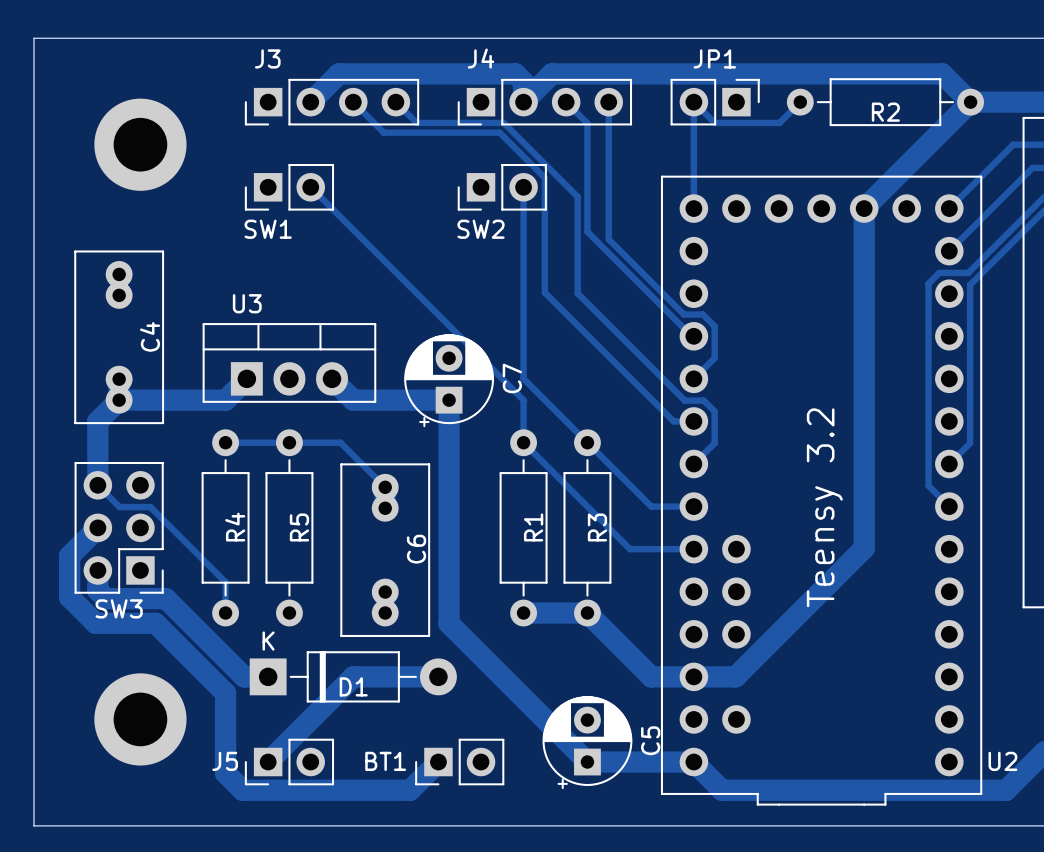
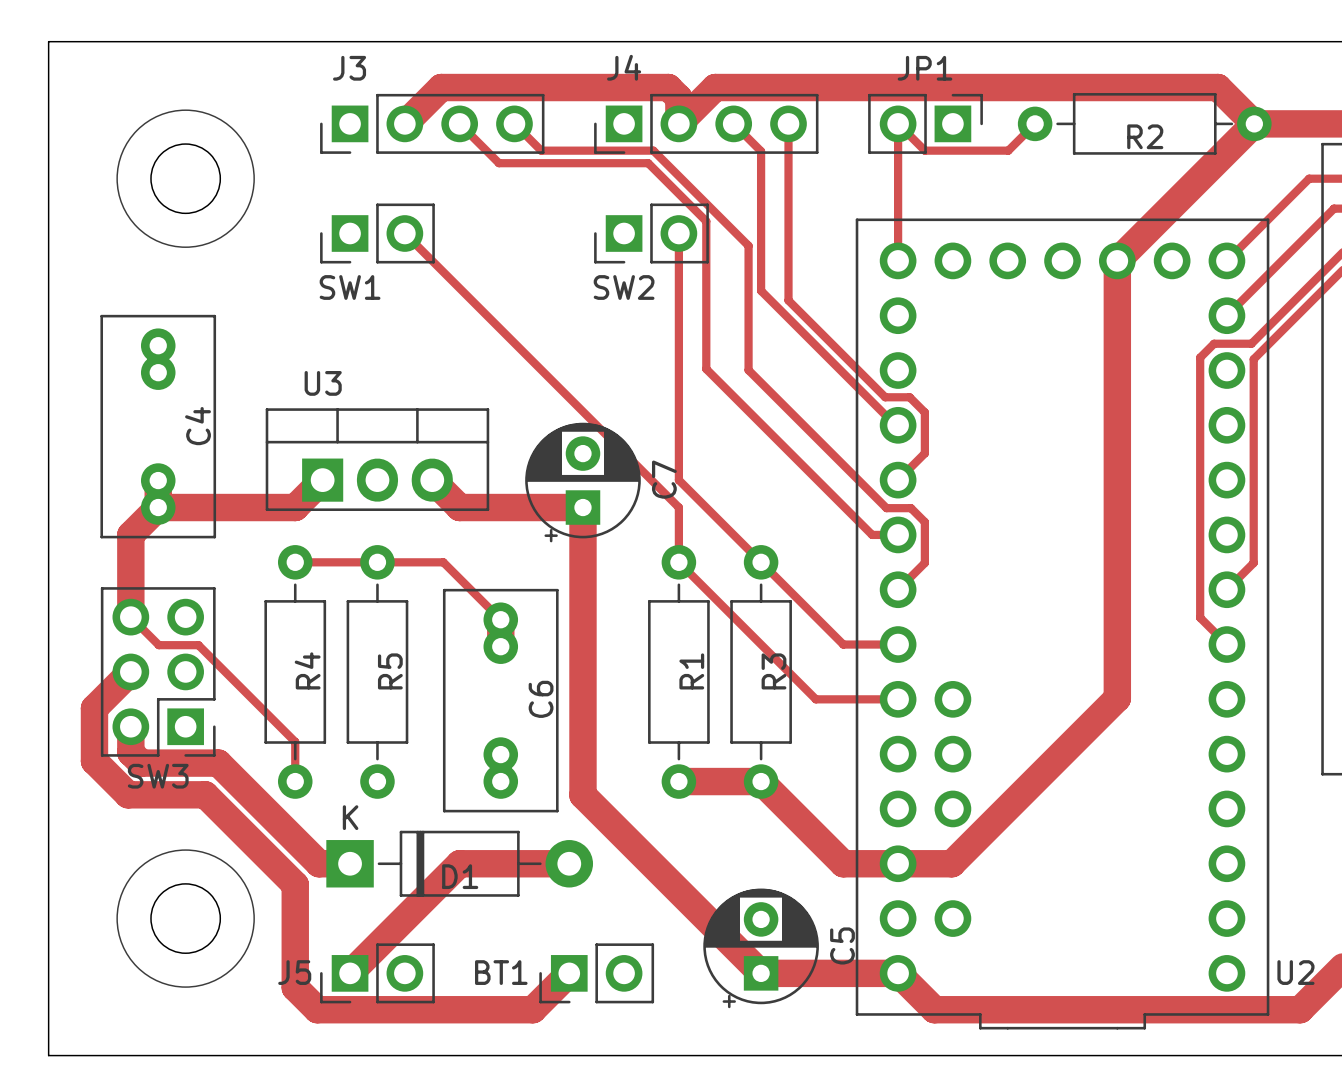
drawing: none -> [116, 109, 255, 248]
round board edge: none -> [150, 143, 221, 214]
part: (140, 144) -> none
text: Teensy 3.2 (824, 507) -> none
drawing: none -> [116, 849, 255, 988]
round board edge: none -> [150, 883, 221, 954]
part: (140, 719) -> none

